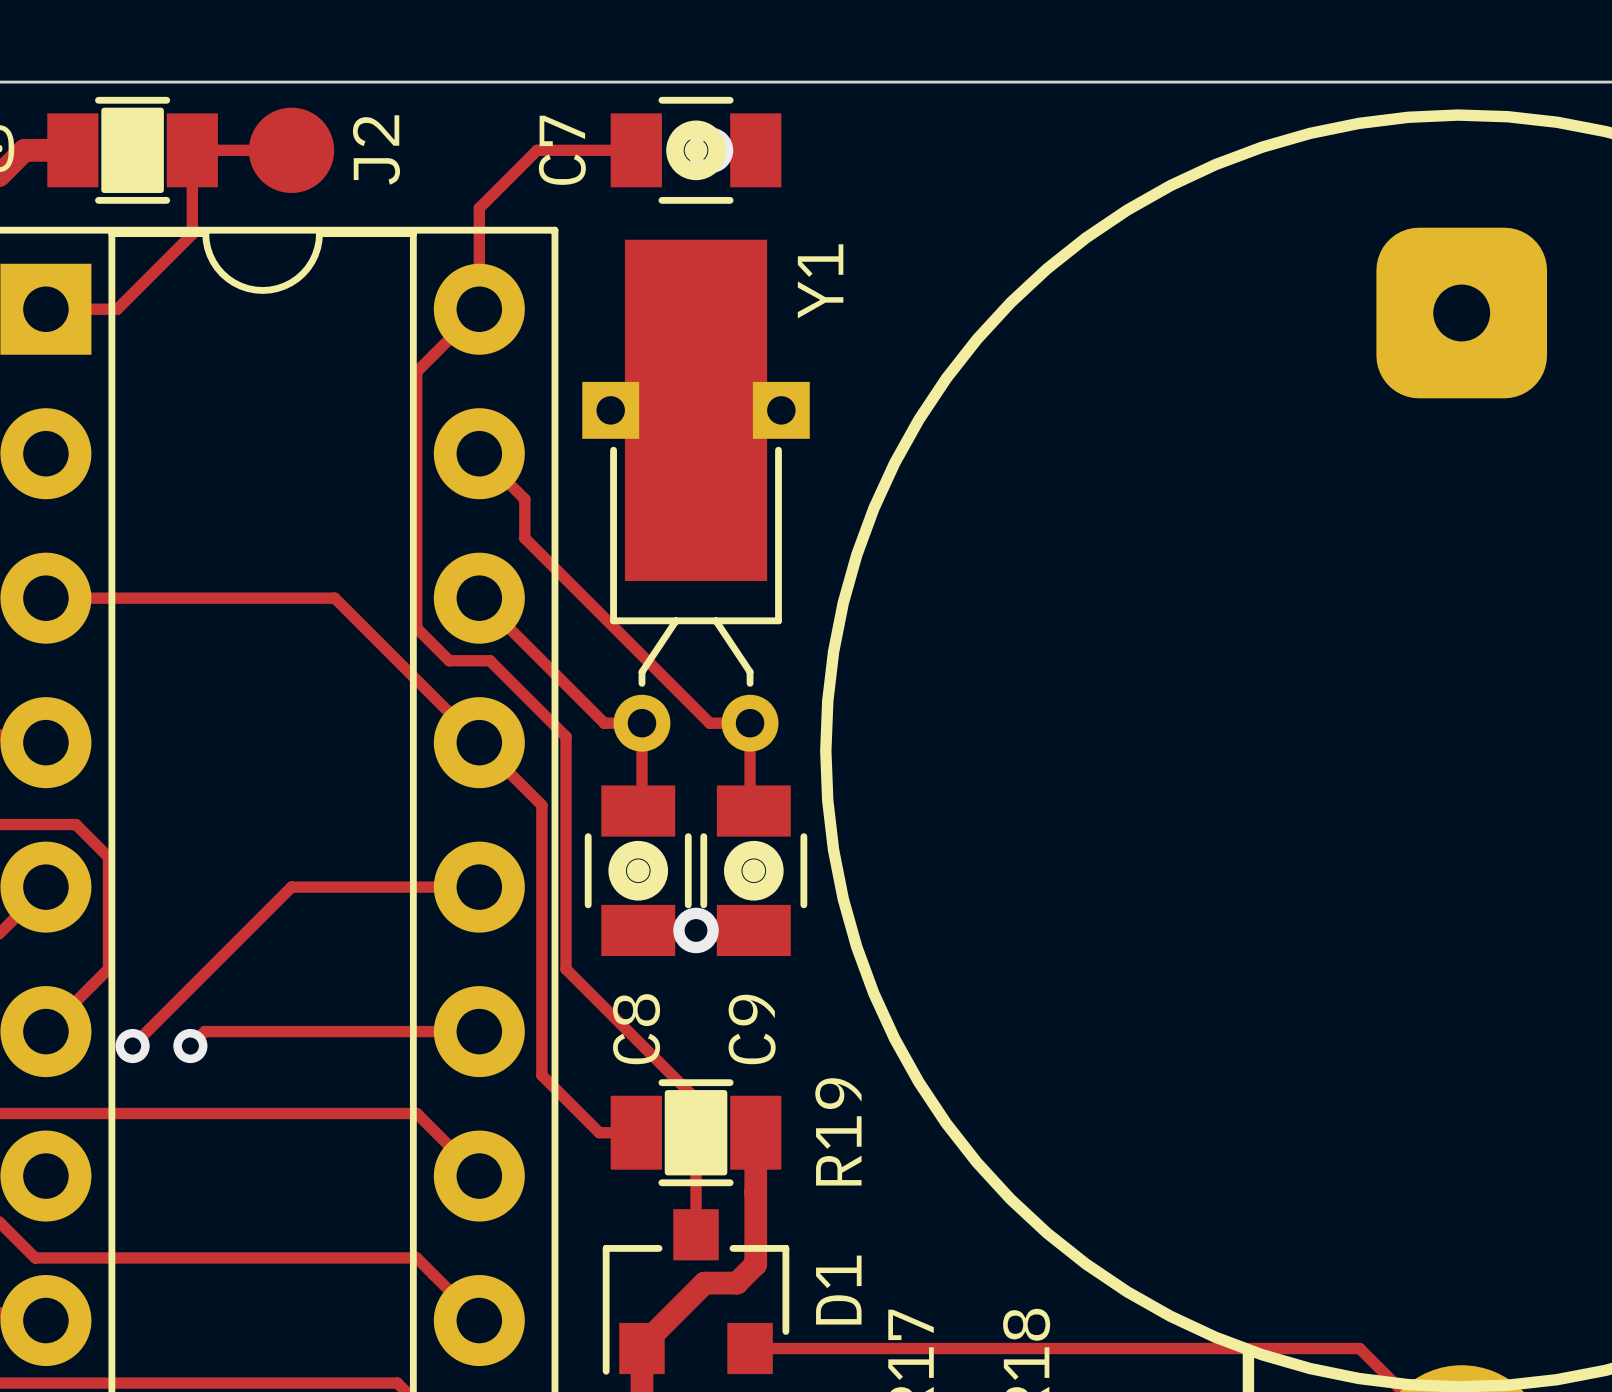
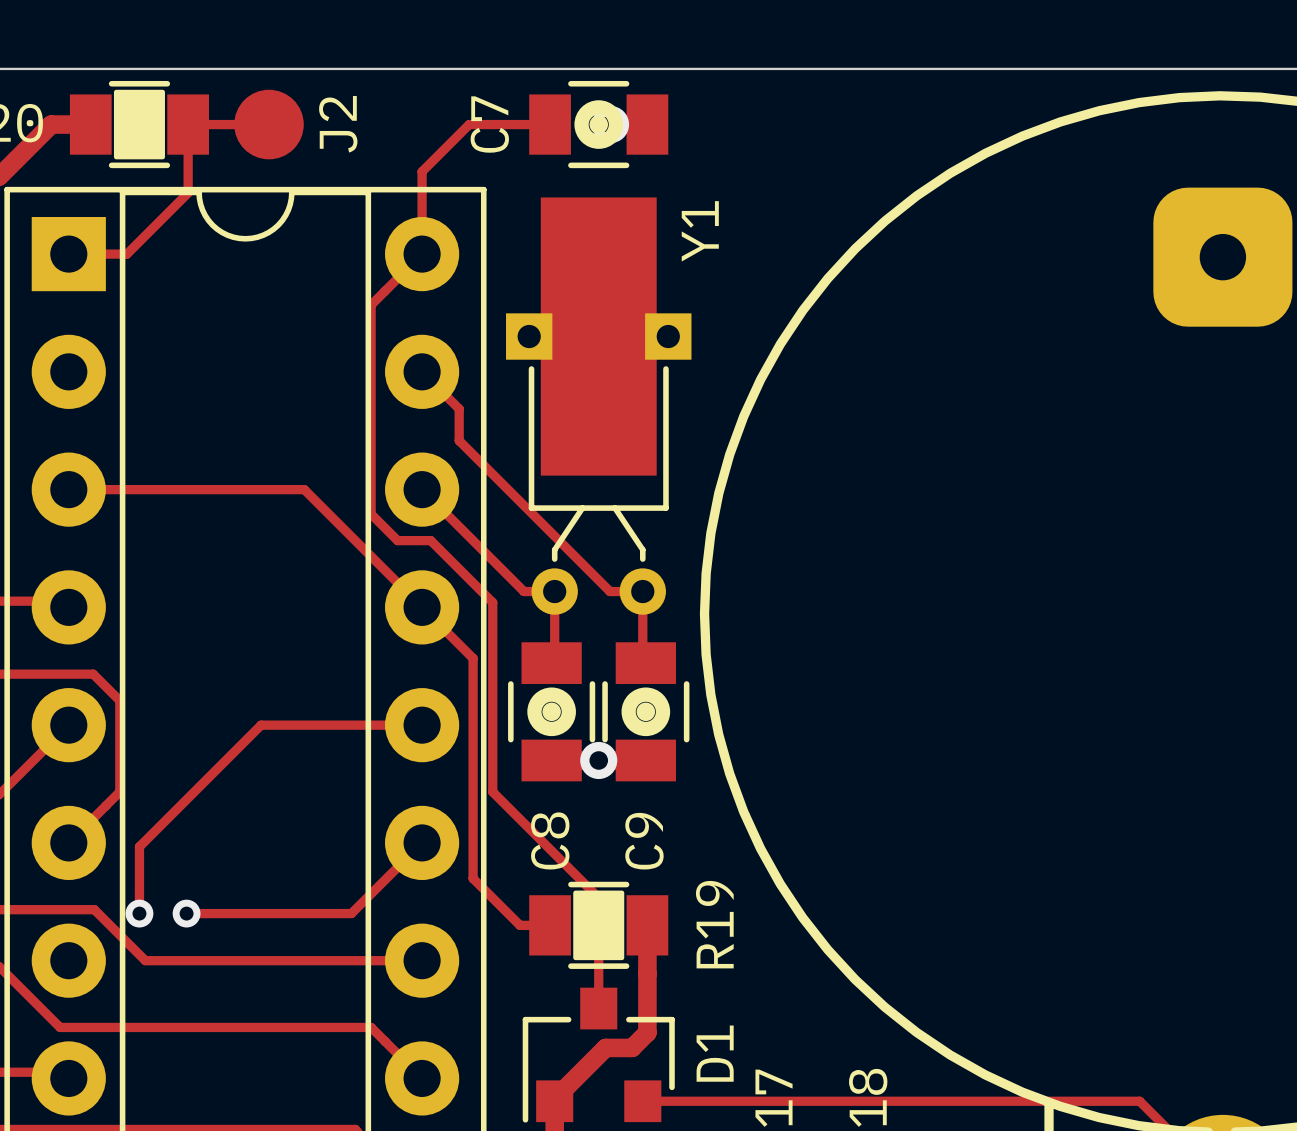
track: (291, 887) (132, 1046) -> (269, 725) (261, 725) (139, 846) (139, 913)
track: (479, 1031) (204, 1031) (190, 1046) -> (422, 842) (351, 913) (186, 913)
via: (132, 1046) -> none
via: (190, 1046) -> none
track: (77, 1113) (416, 1113) (479, 1176) -> (94, 909) (145, 960) (422, 960)
via: none -> (139, 913)
via: none -> (186, 913)

